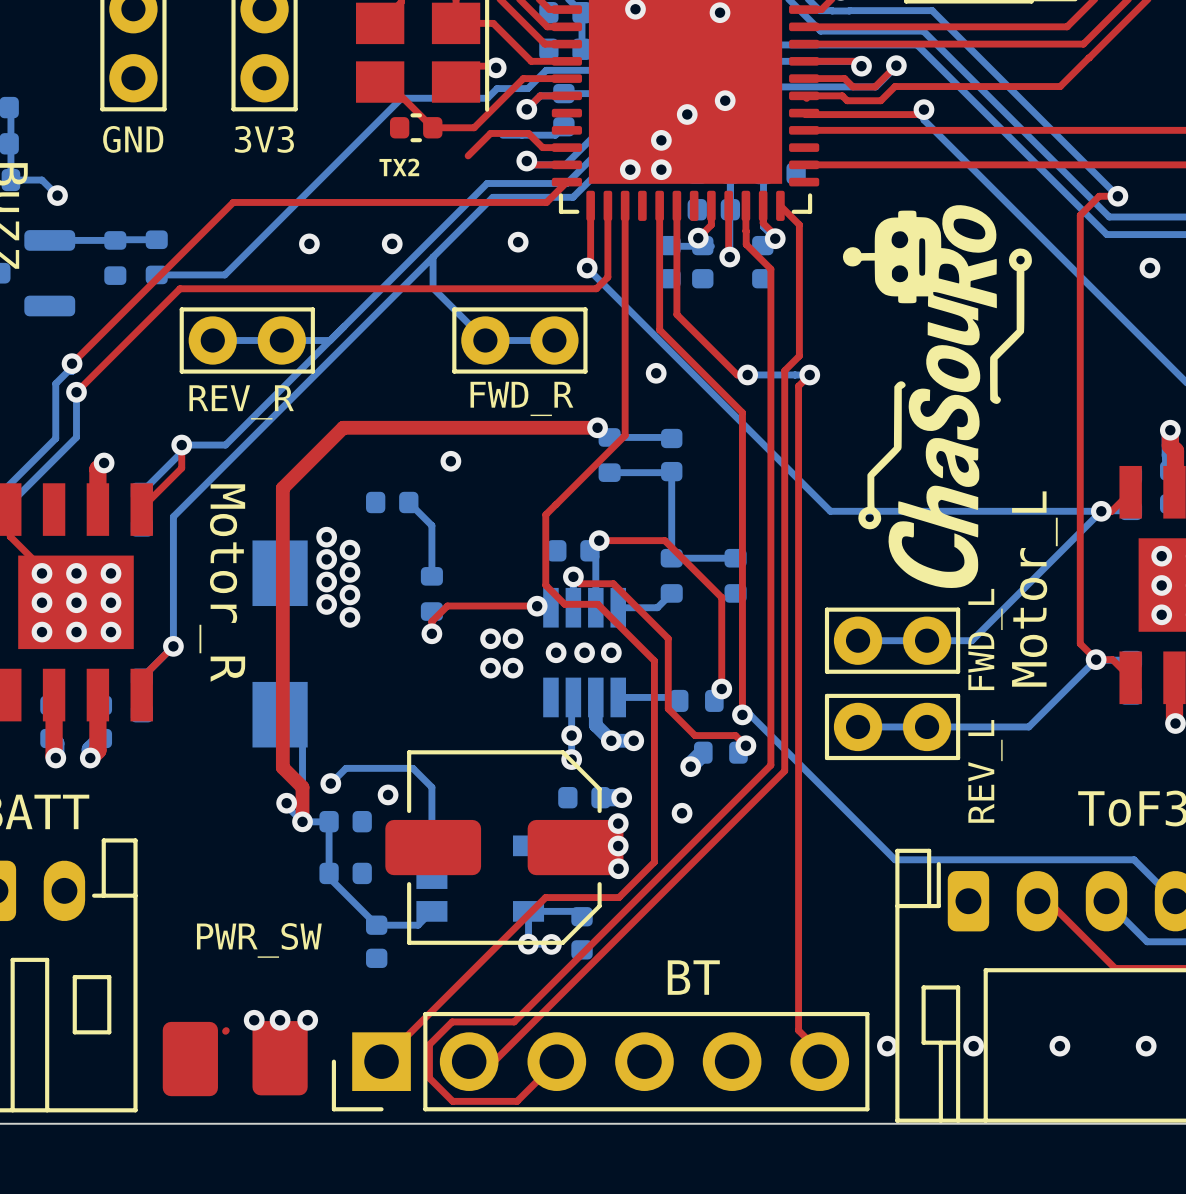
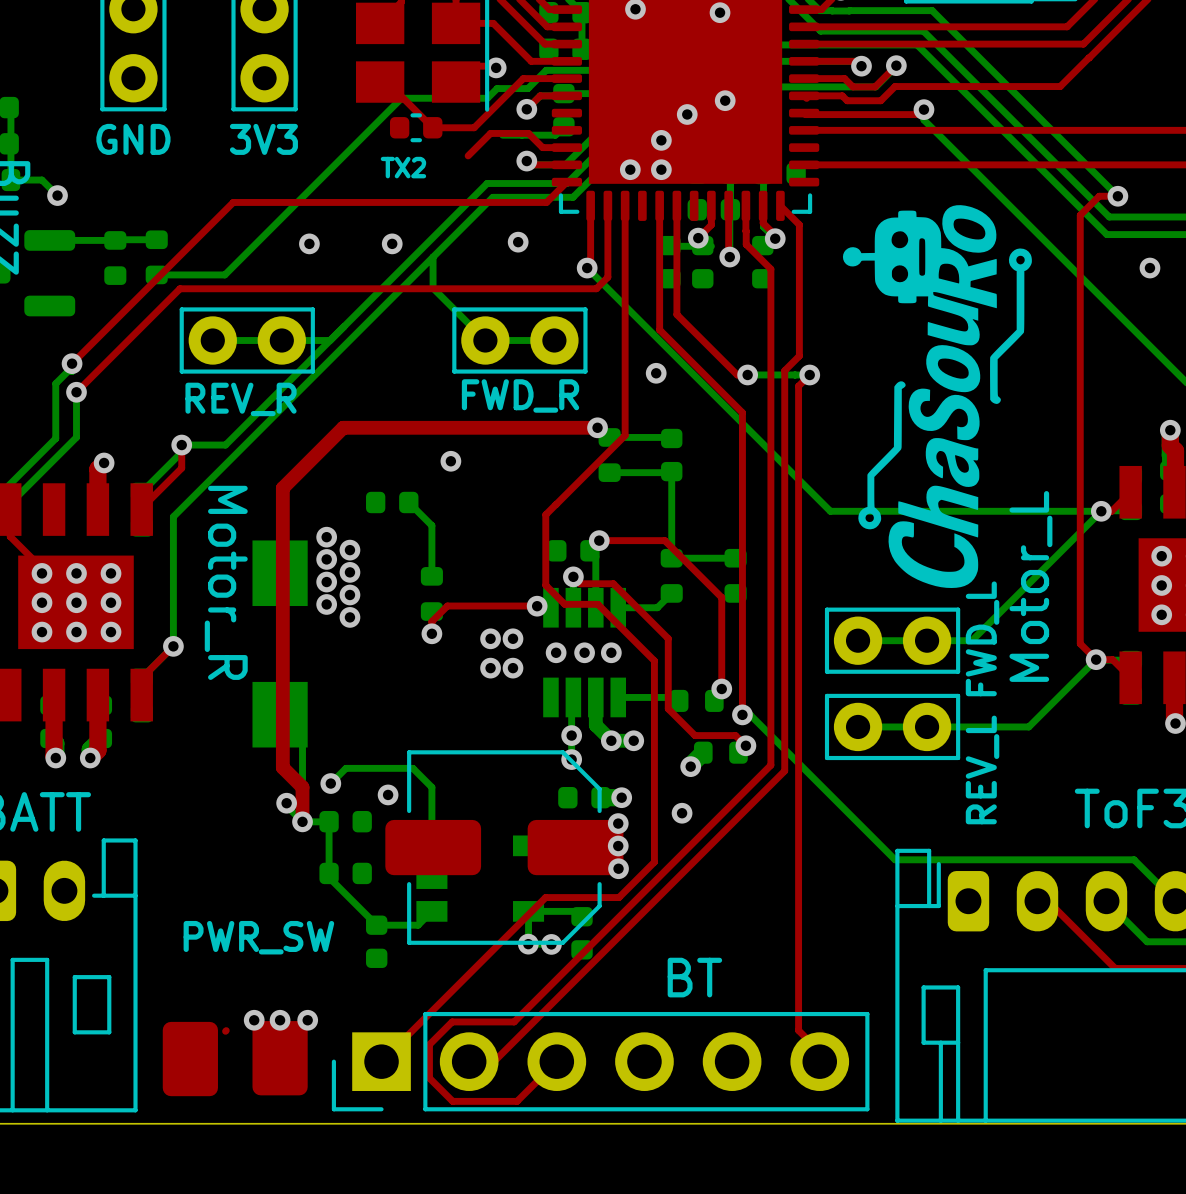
via: (887, 1046) -> none
via: (973, 1046) -> none
via: (1059, 1046) -> none
via: (1146, 1046) -> none

